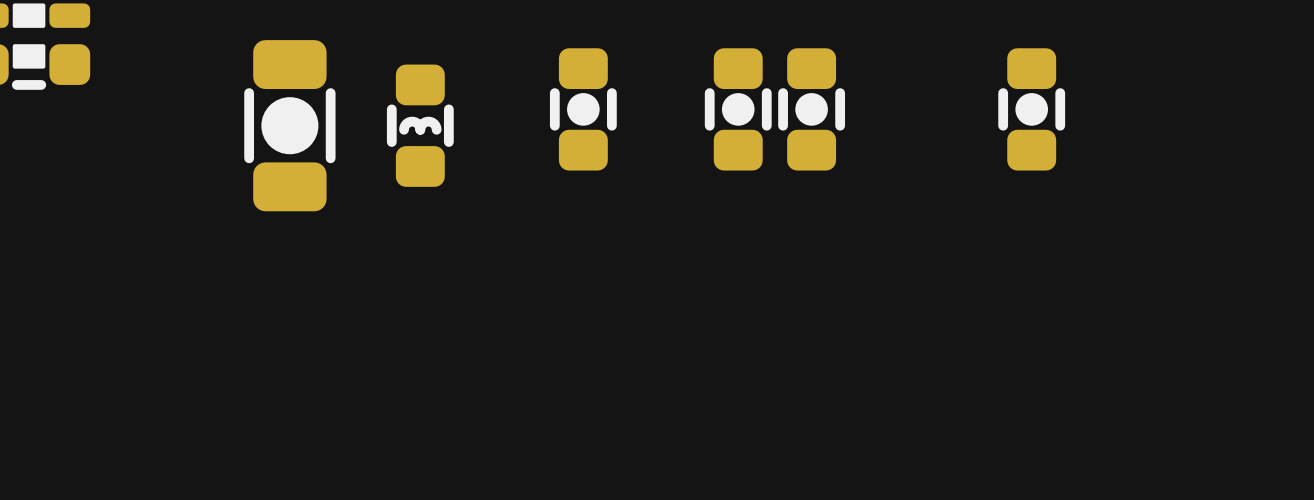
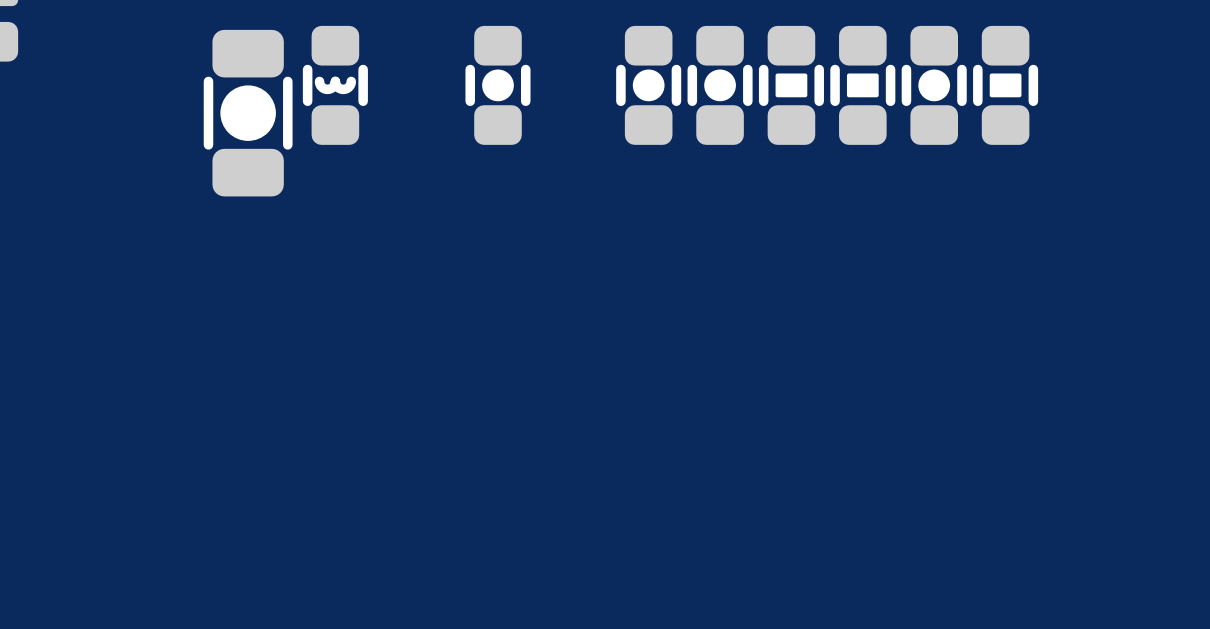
part: none -> (791, 85)
part: none -> (862, 85)
part: none -> (1005, 85)
part position: (289, 125) -> (248, 113)
part rotation: 0° (420, 125) -> 180° (335, 85)

